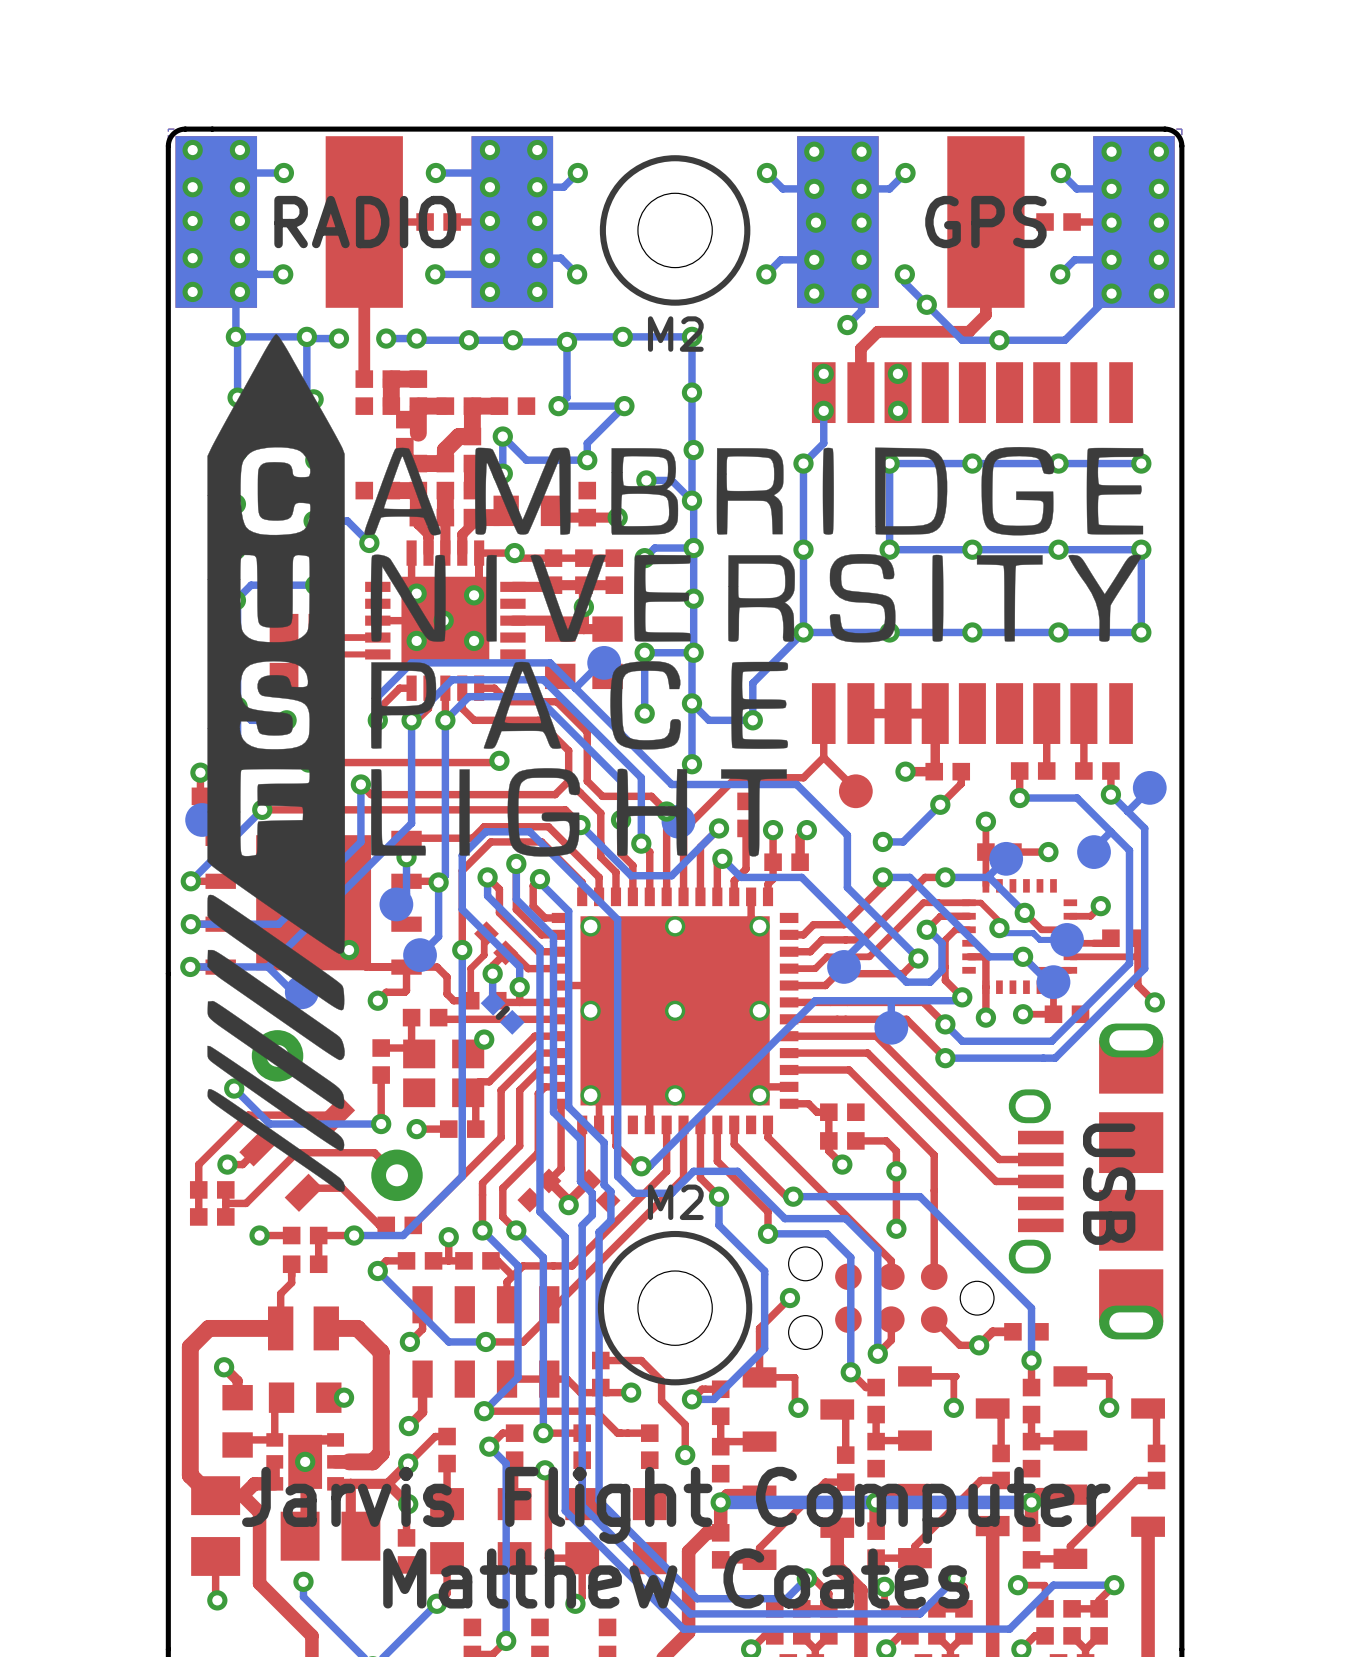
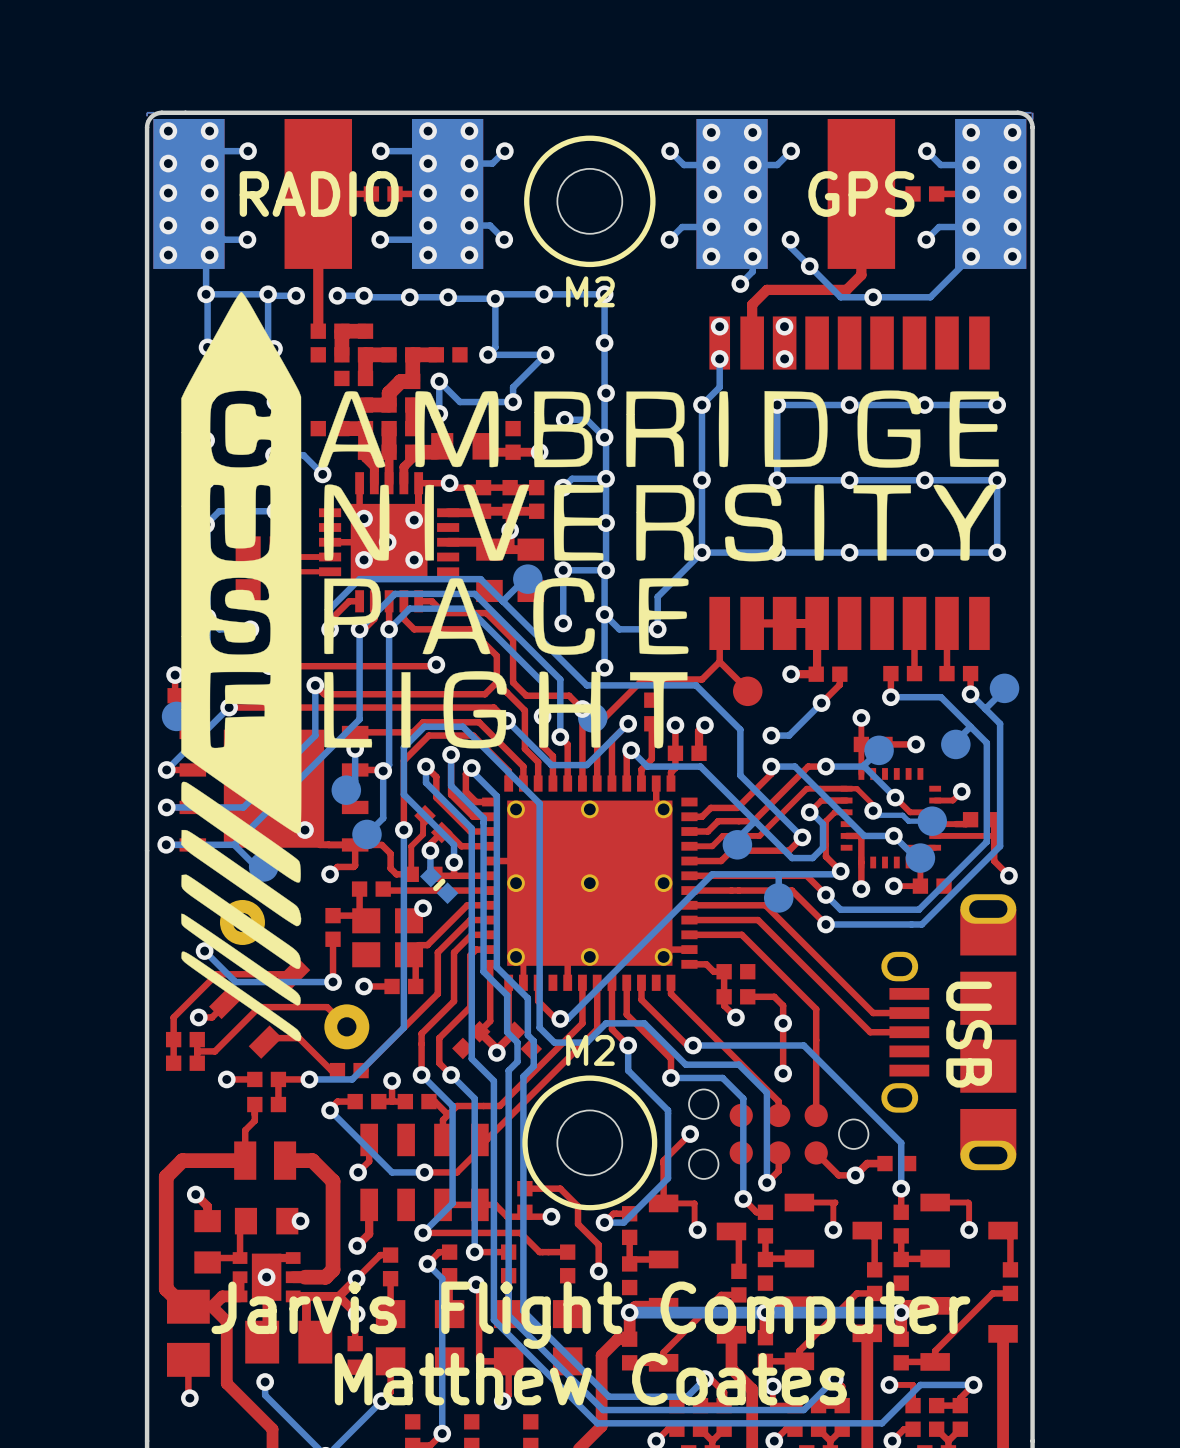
part rotation: 0° (404, 433) -> 90° clockwise (353, 378)

